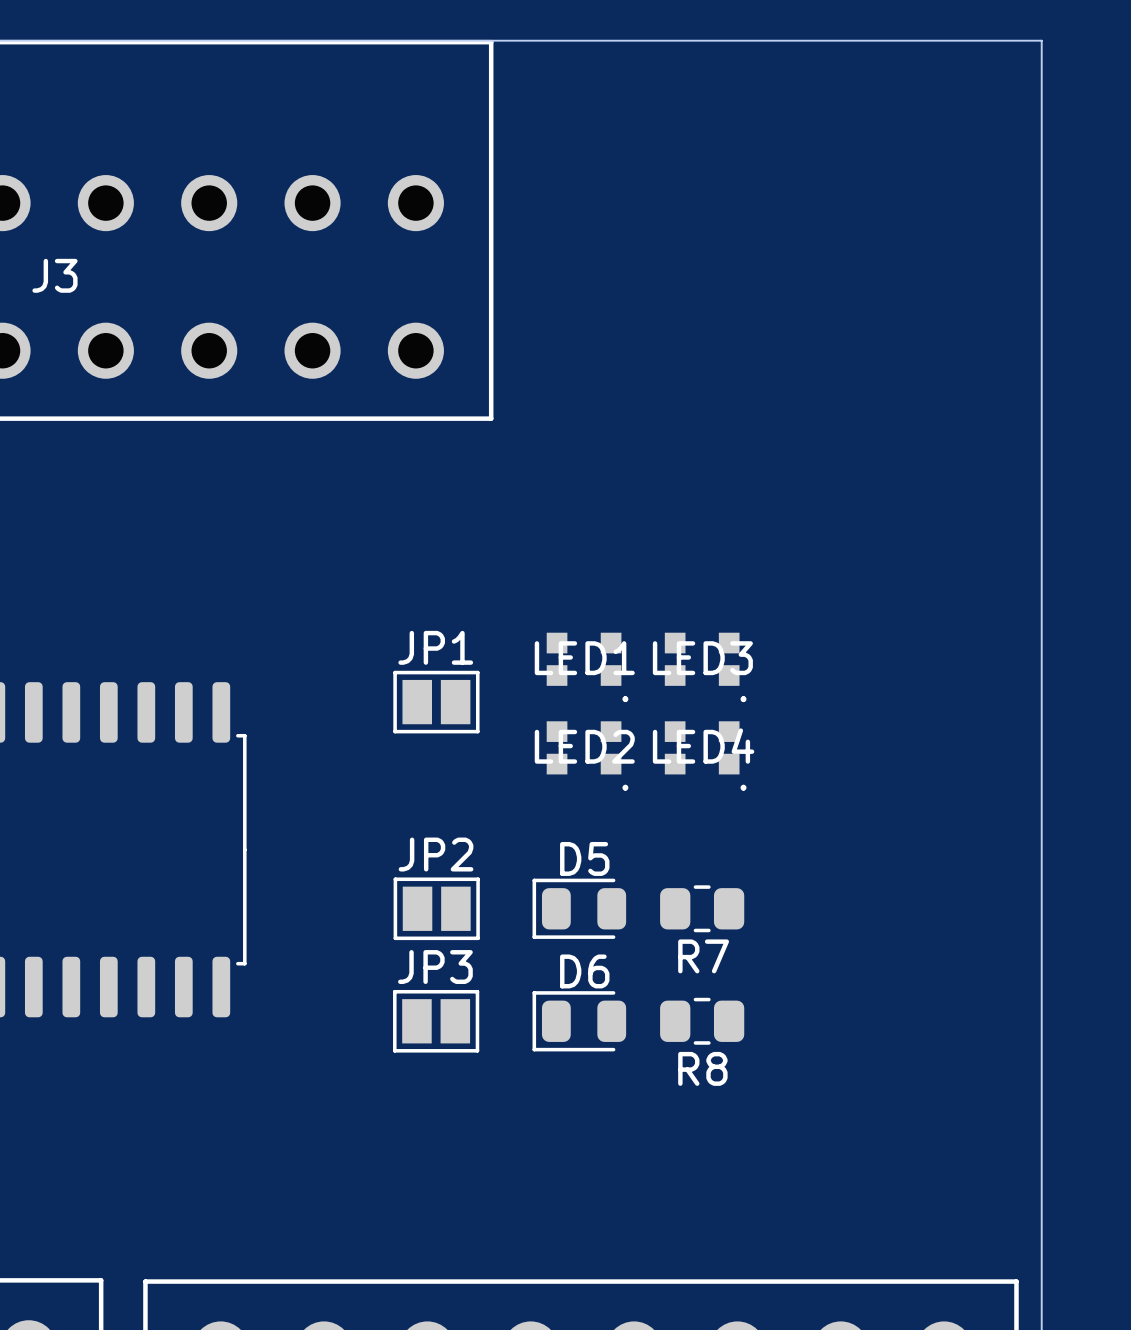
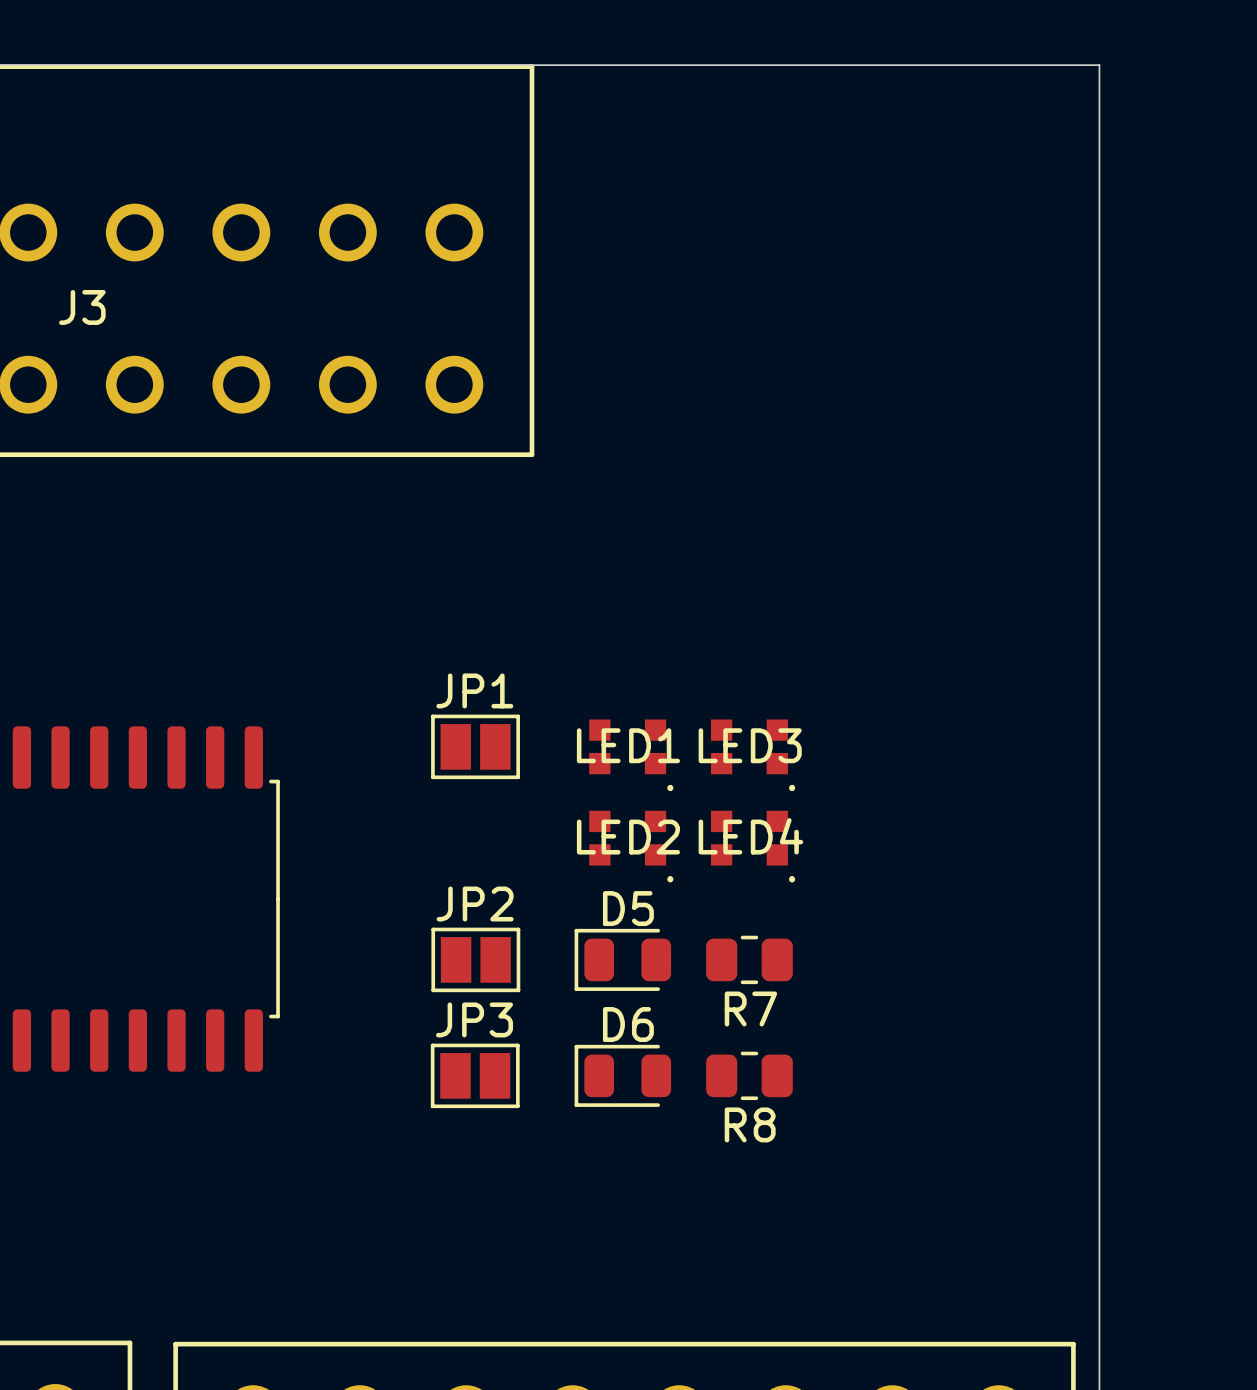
LED1 position: (587, 667) -> (631, 755)
LED3 position: (705, 667) -> (753, 755)
LED2 position: (587, 755) -> (631, 846)
LED4 position: (705, 755) -> (753, 846)

